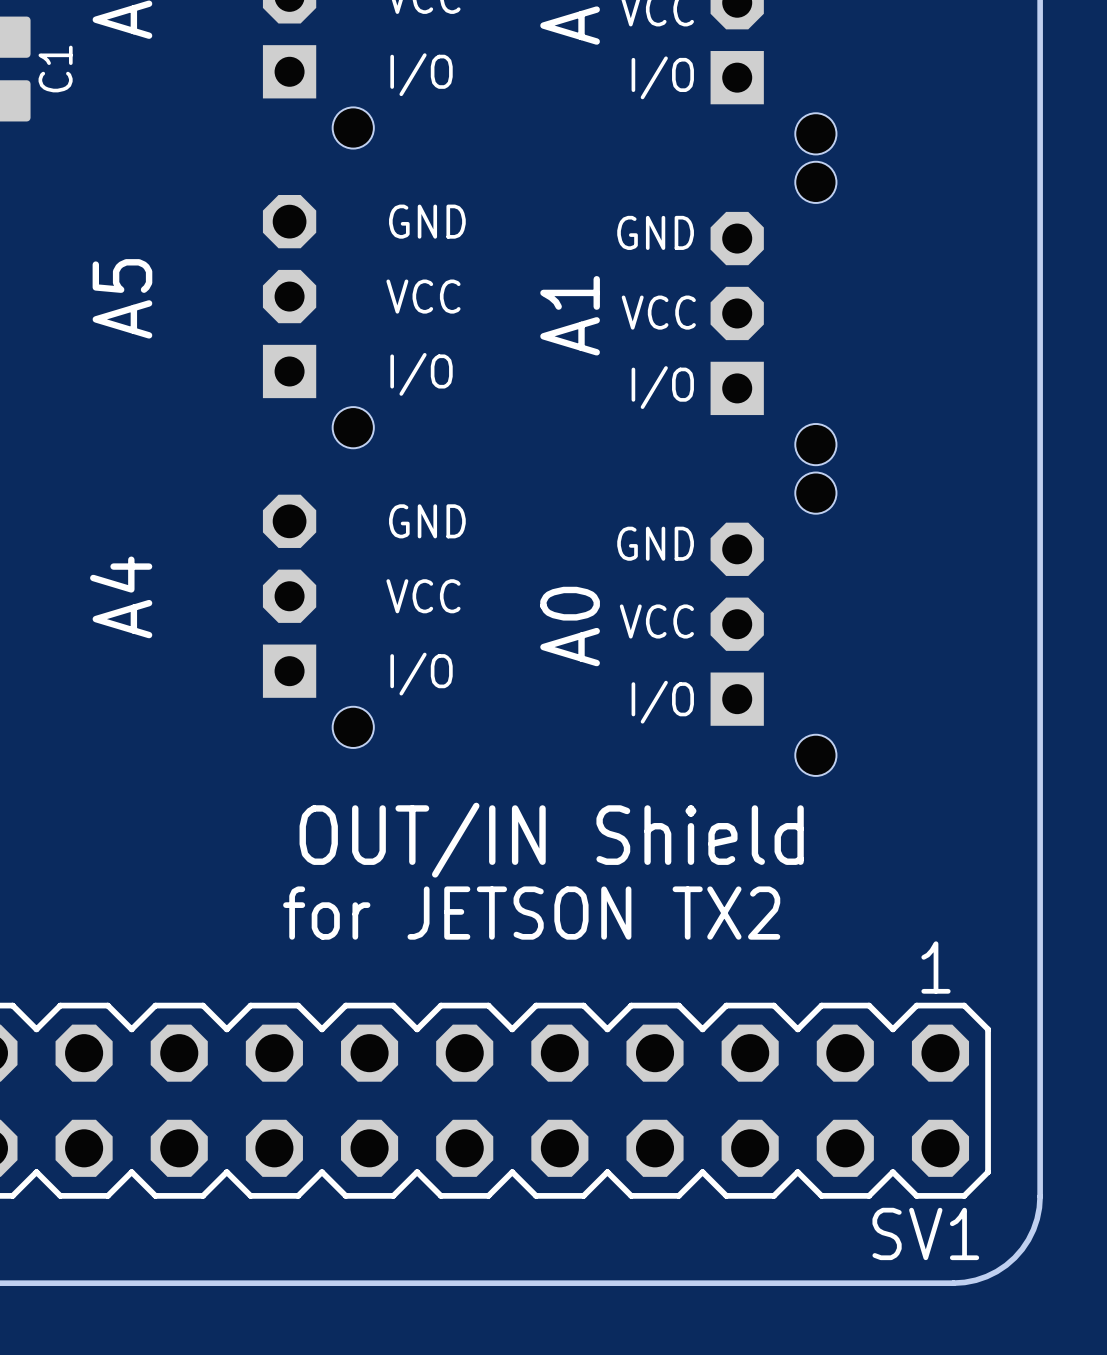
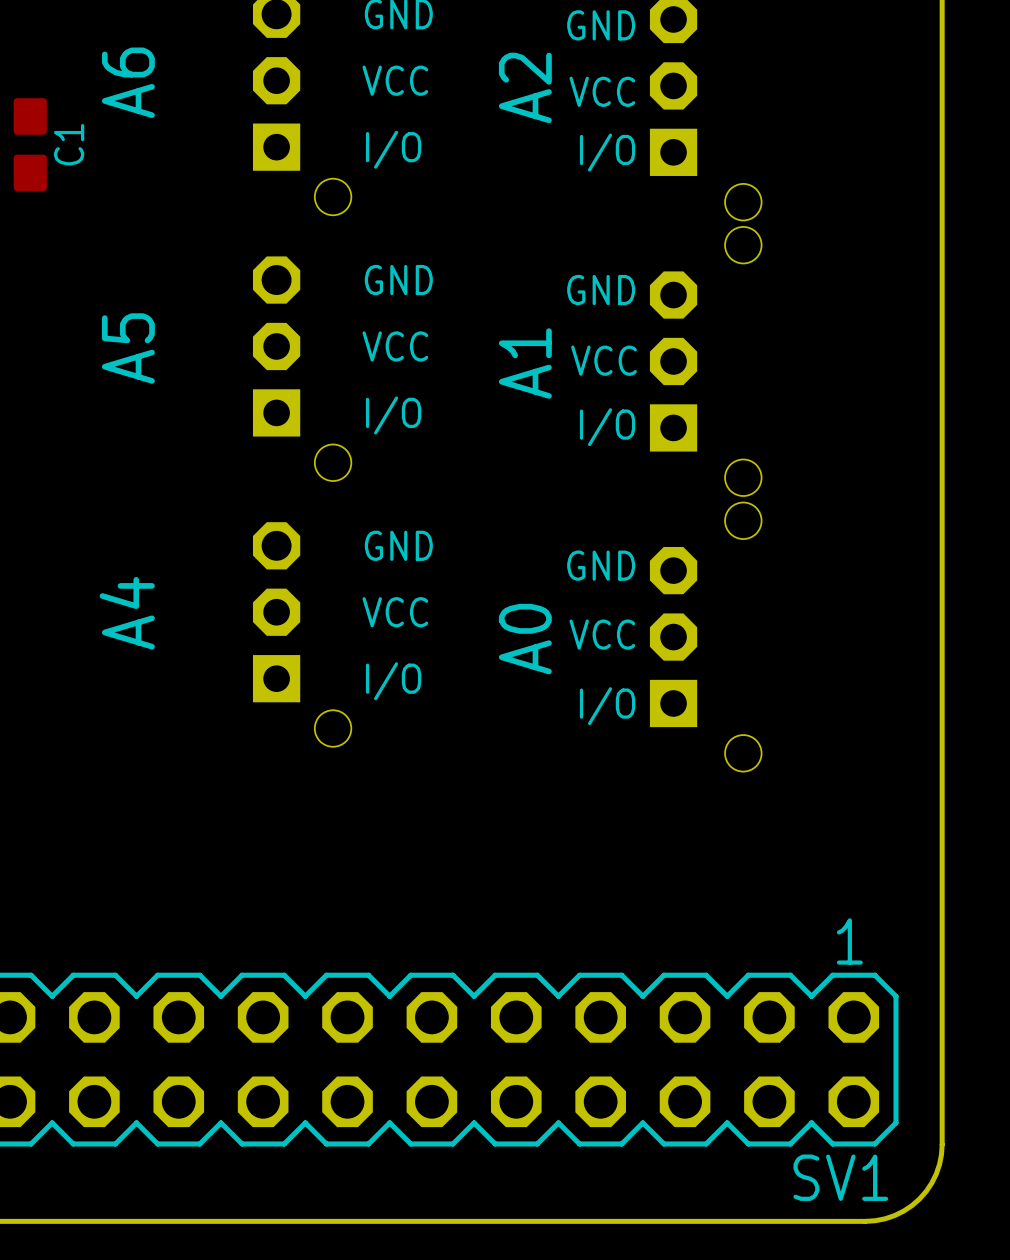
text: OUT/IN Shield (551, 840) -> none
text: for JETSON TX2 (531, 913) -> none

